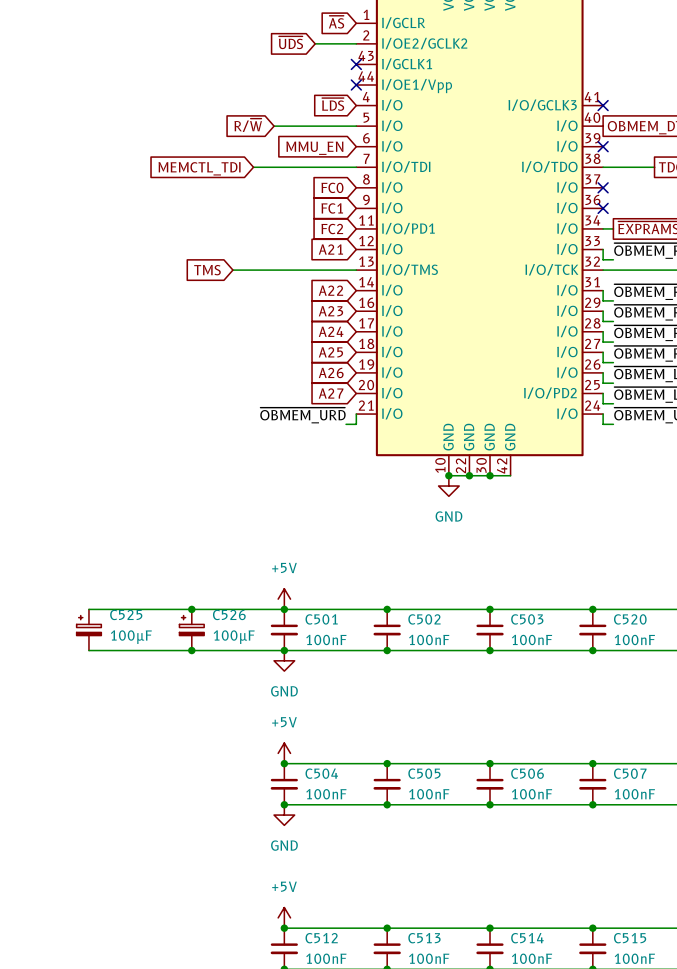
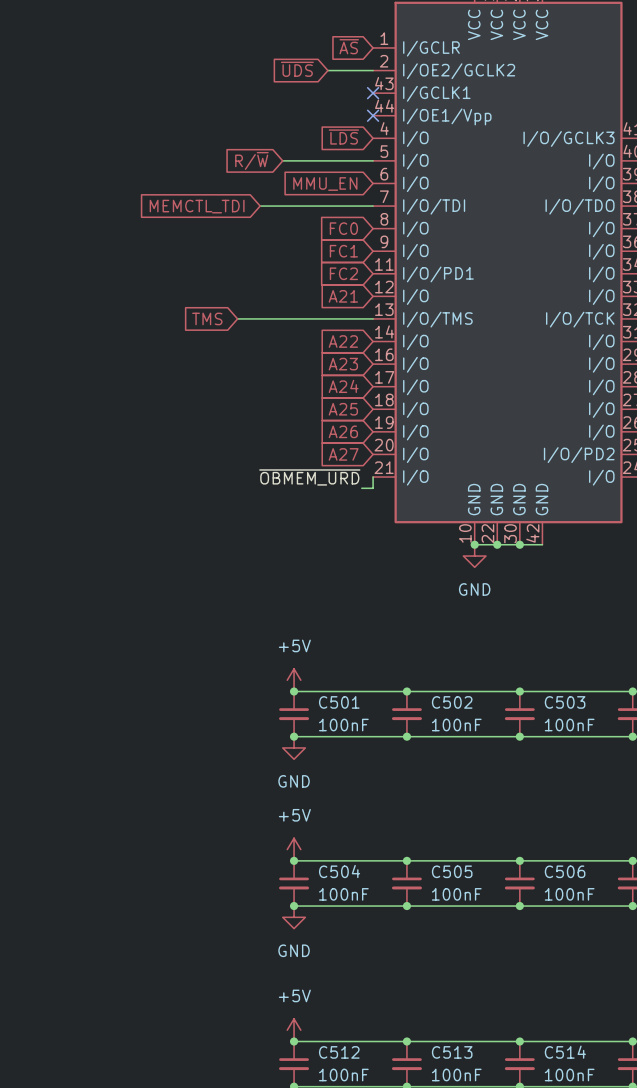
wire: (88, 609) (284, 609) -> none
junction: (191, 609) -> none
C525: 100µF (88, 629) -> none
C526: 100µF (191, 629) -> none
wire: (88, 650) (284, 650) -> none
junction: (191, 650) -> none

